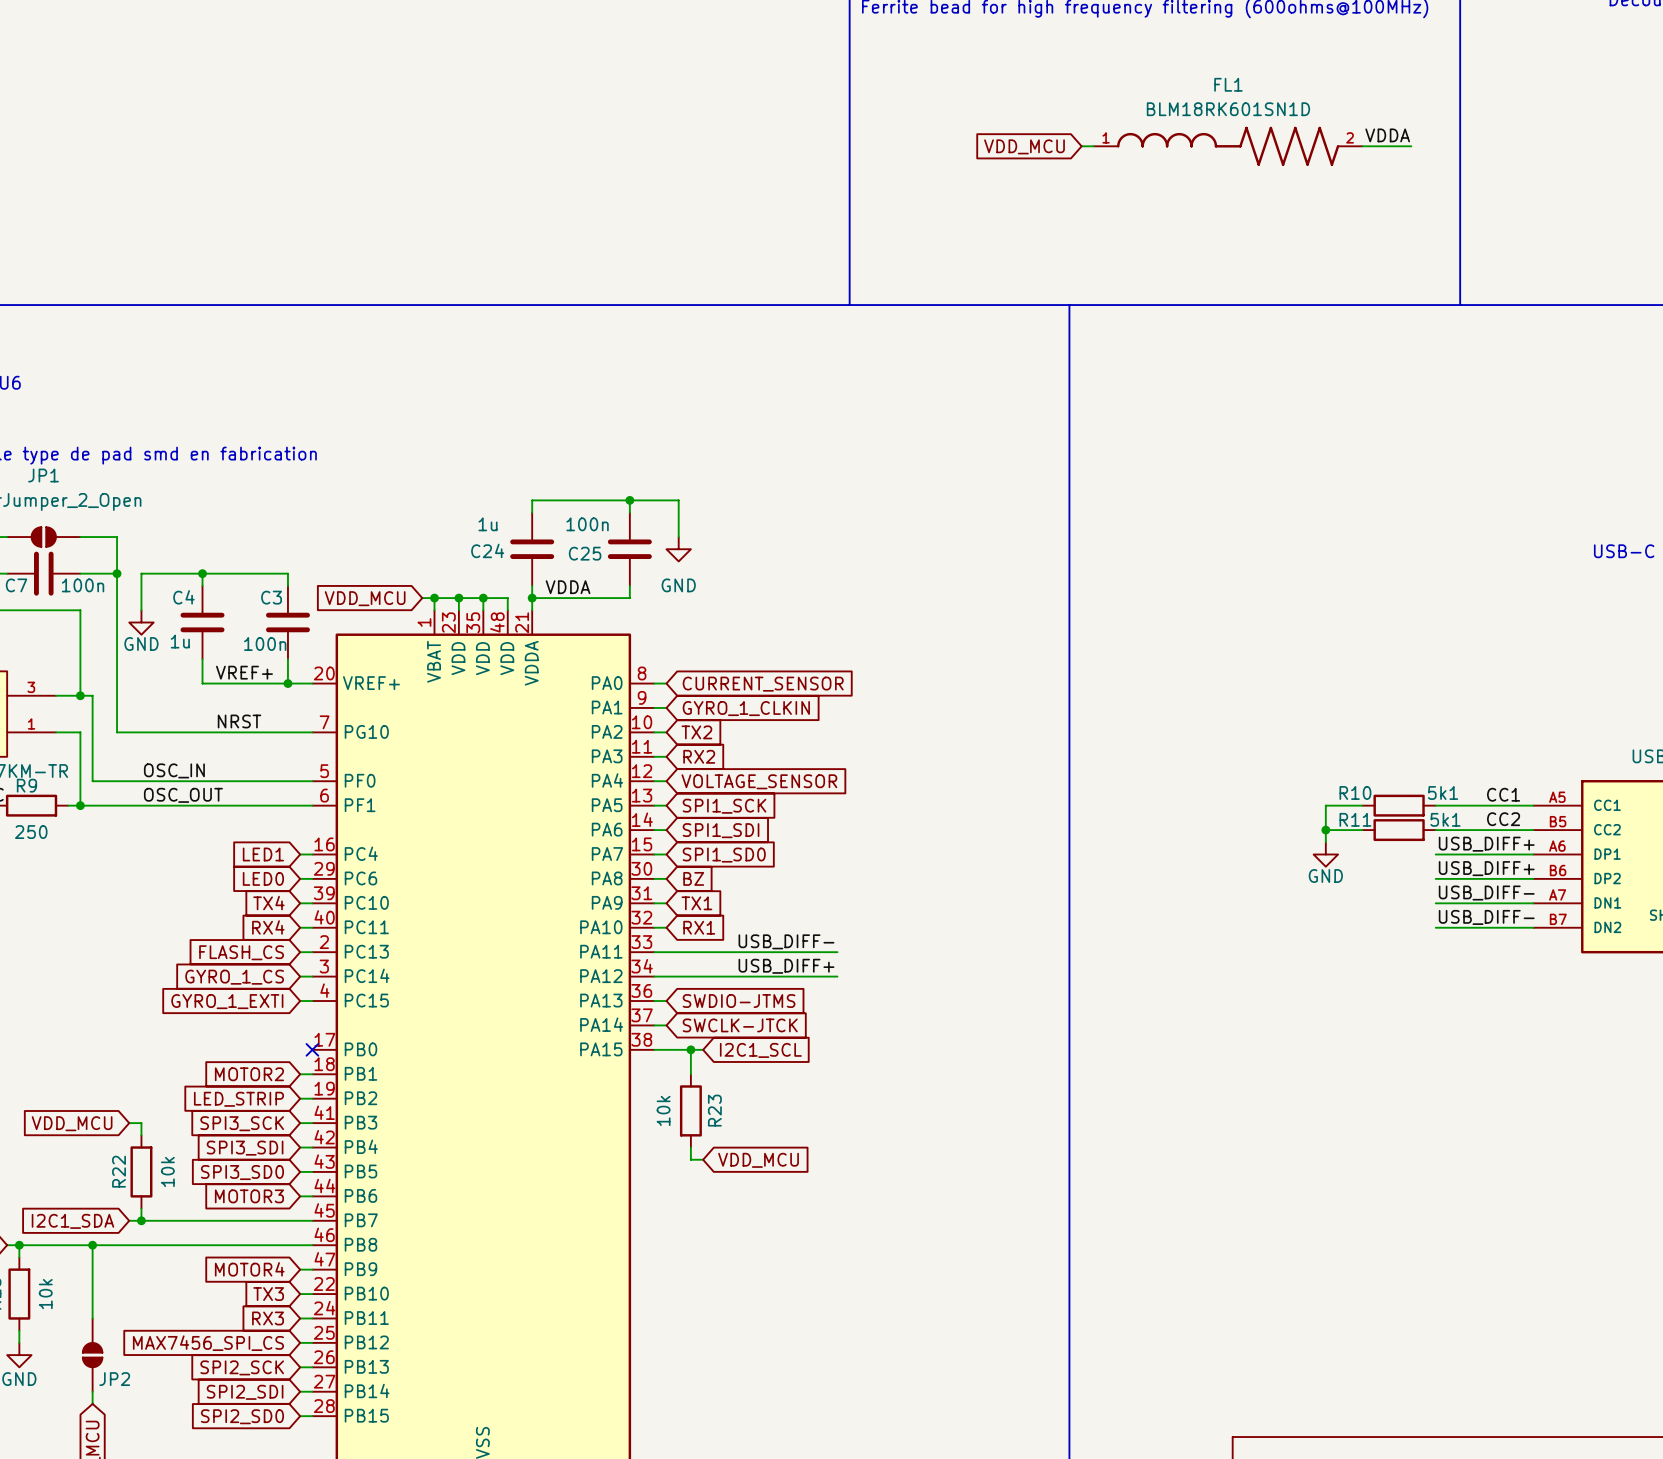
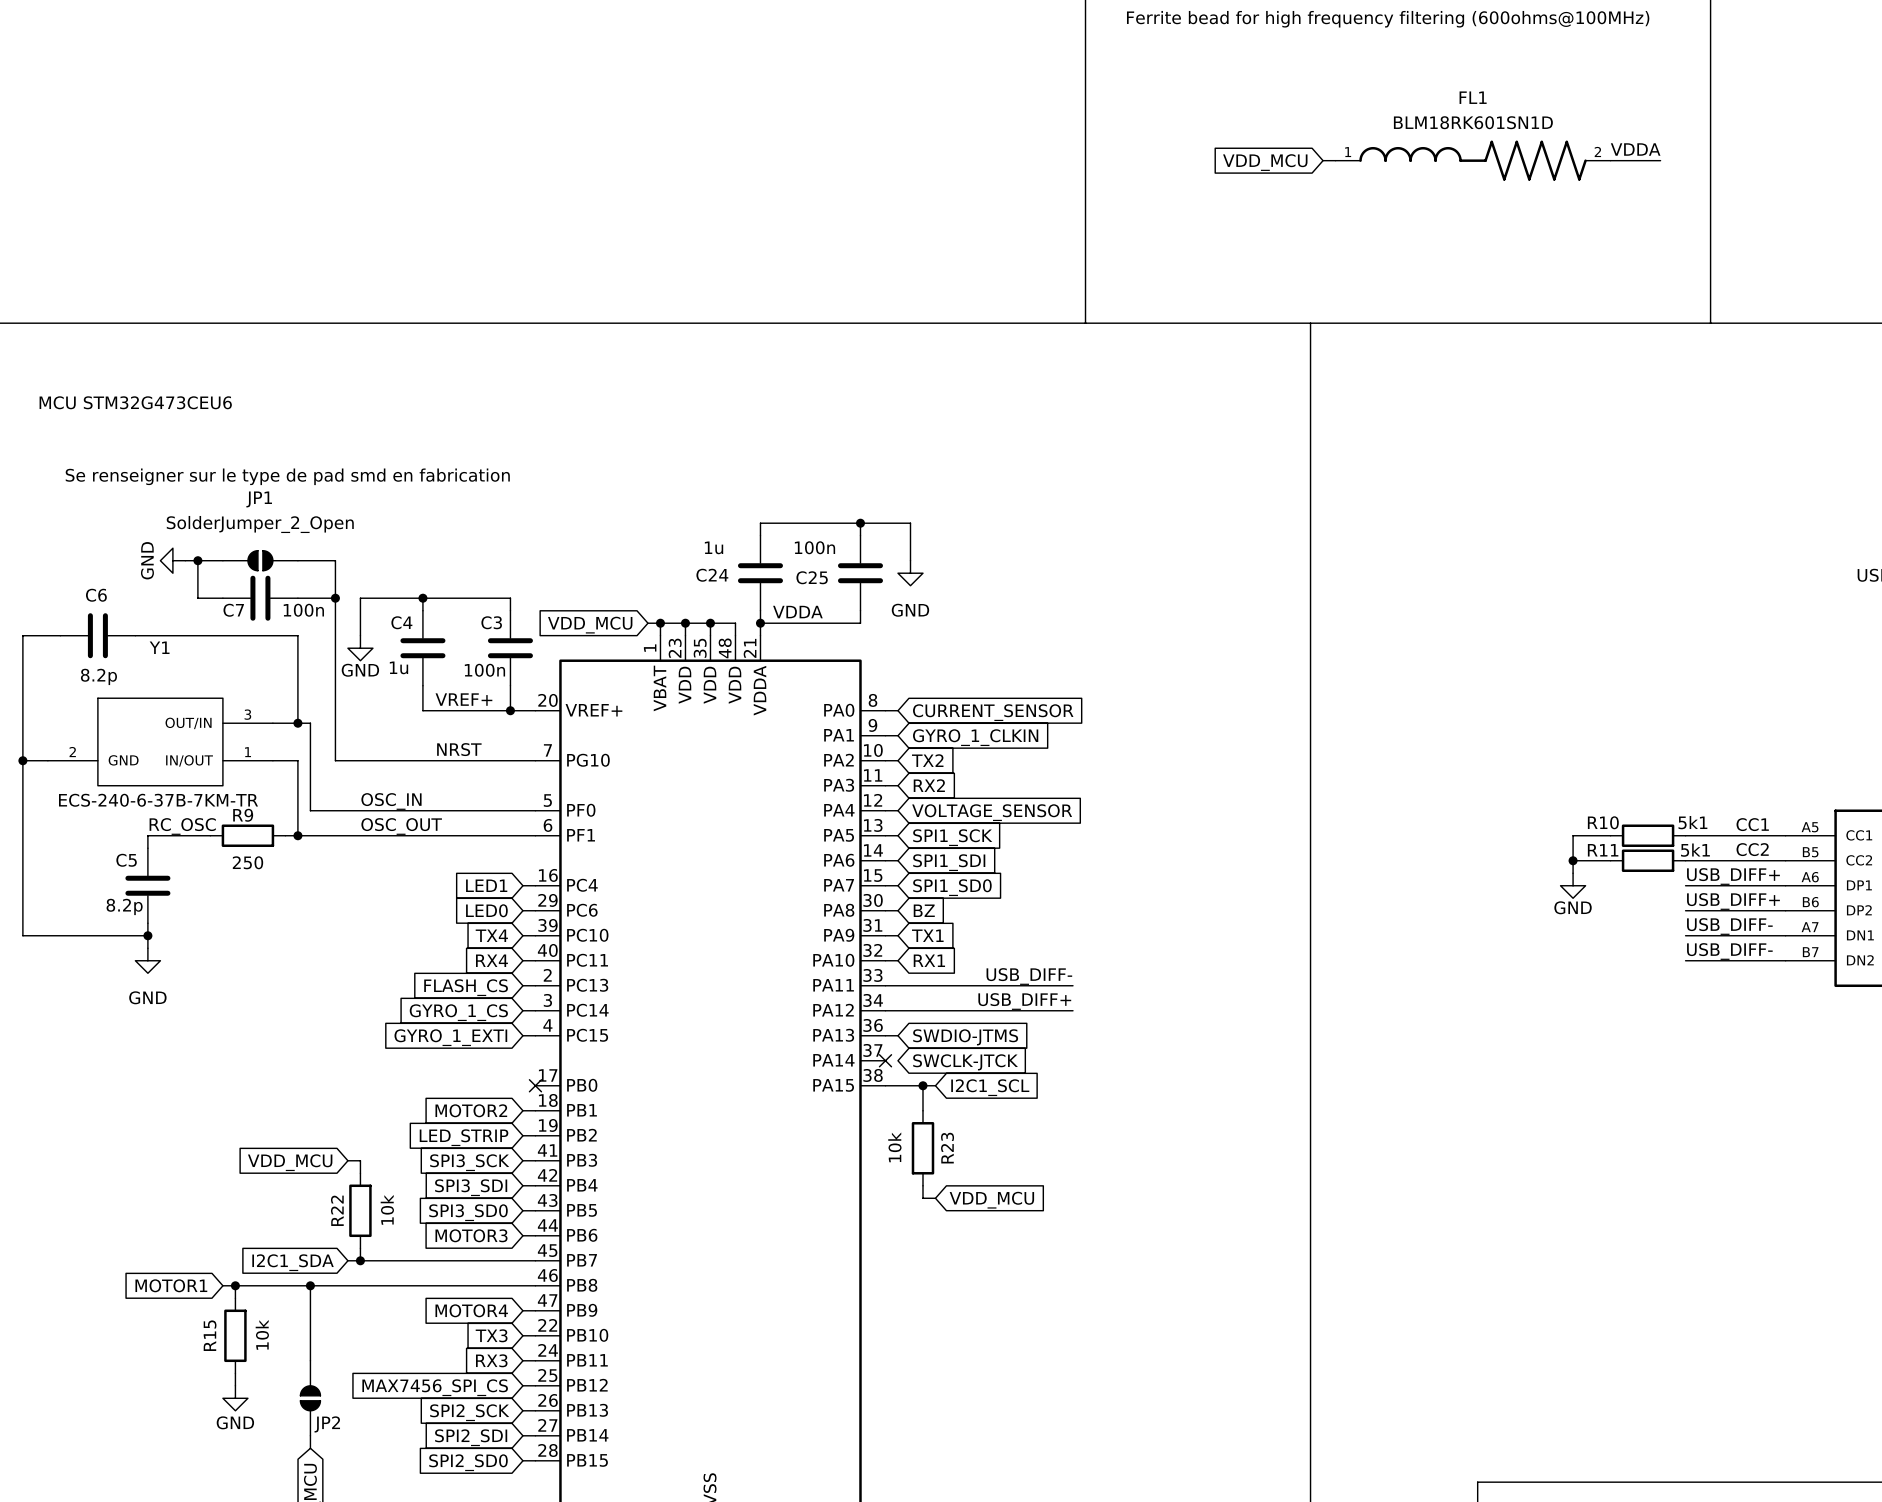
wire: (654, 1025) (666, 1025) -> none
no-connect mark: none -> (885, 1060)

